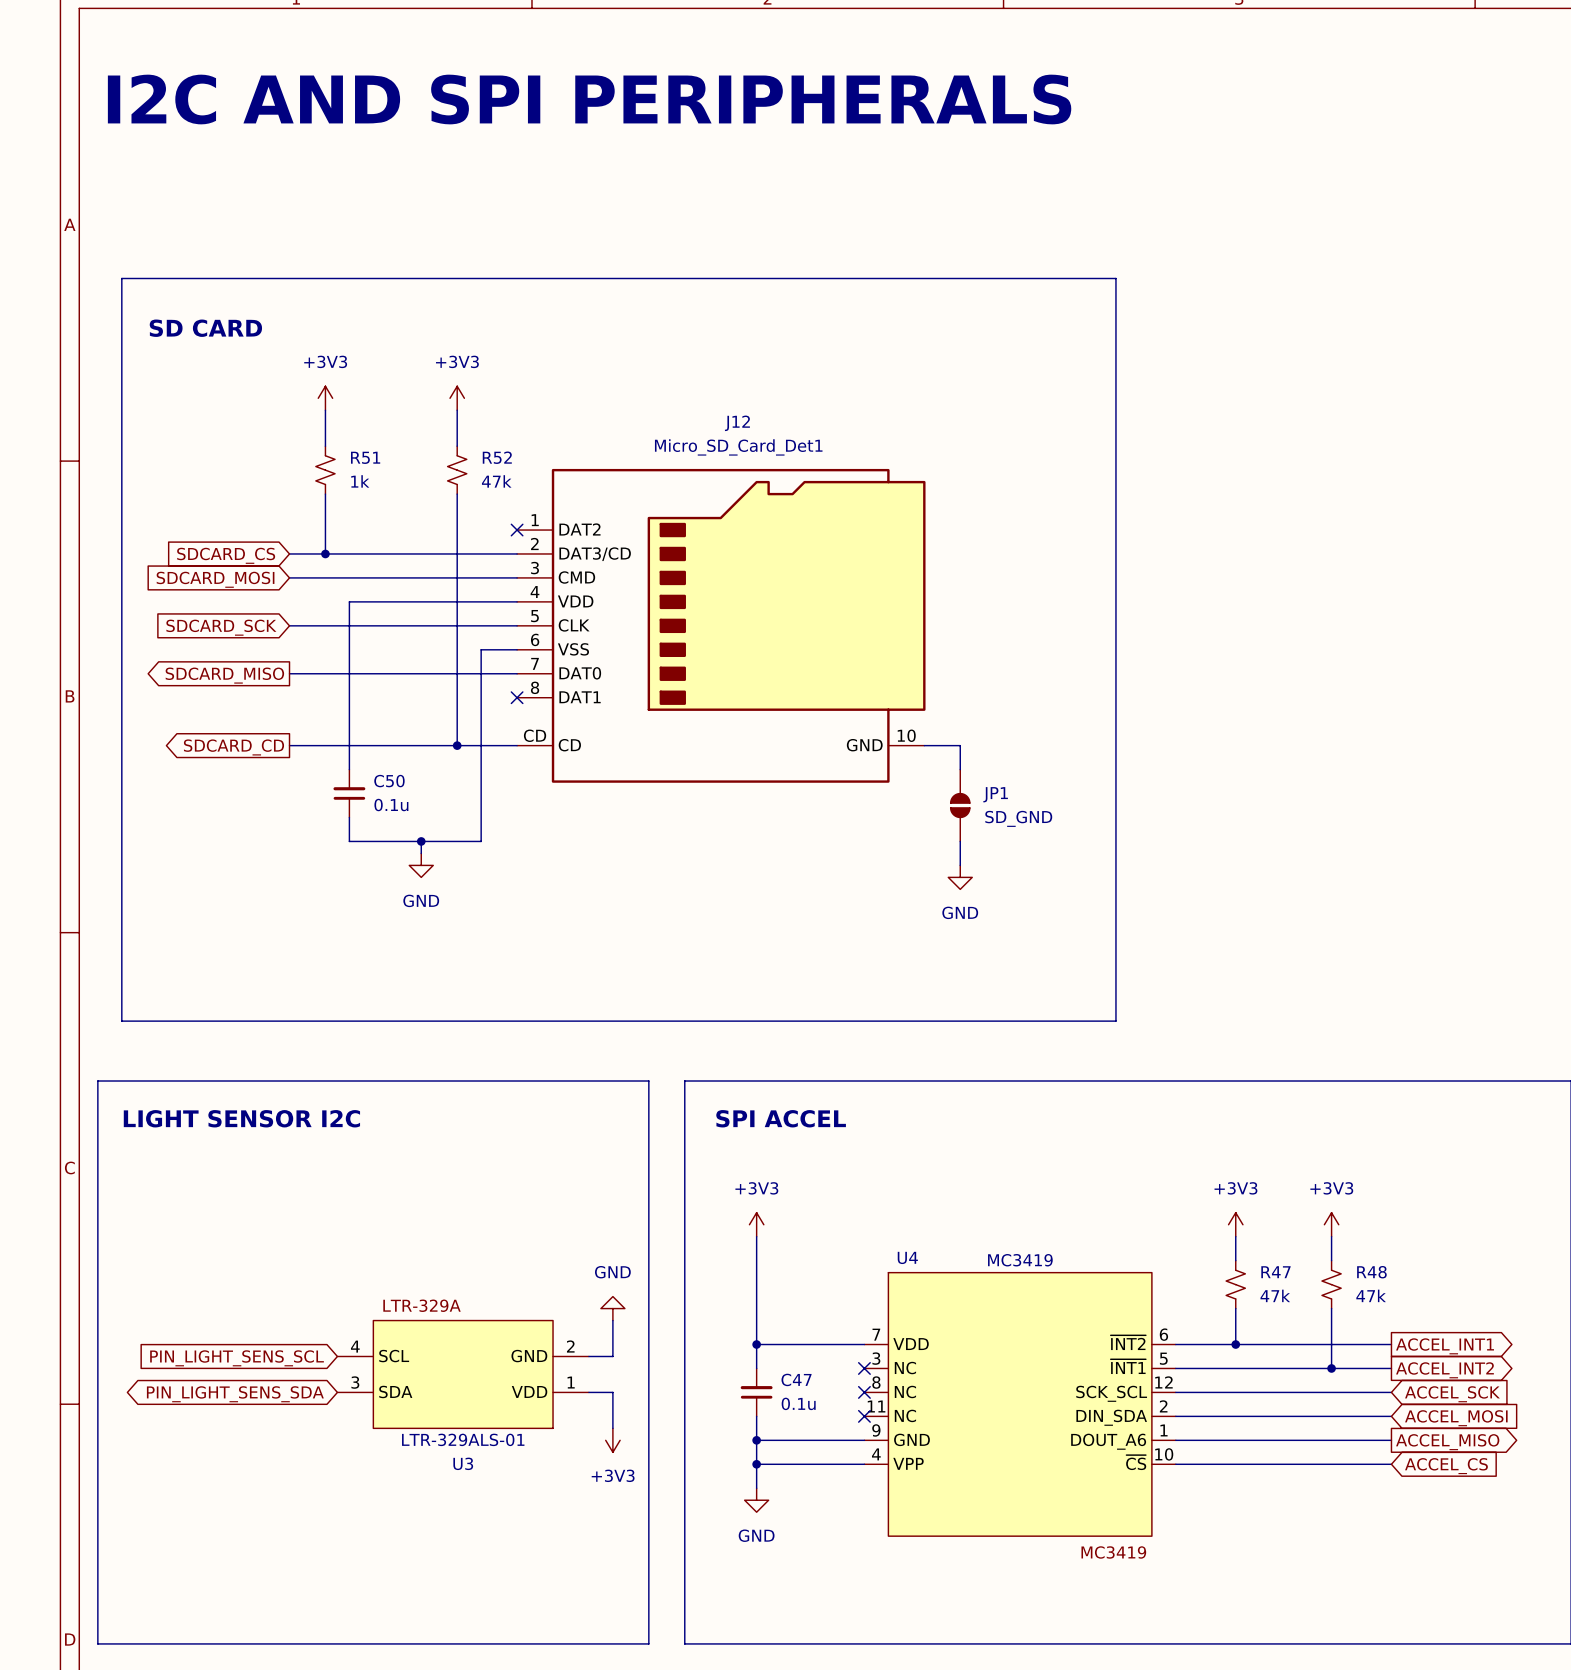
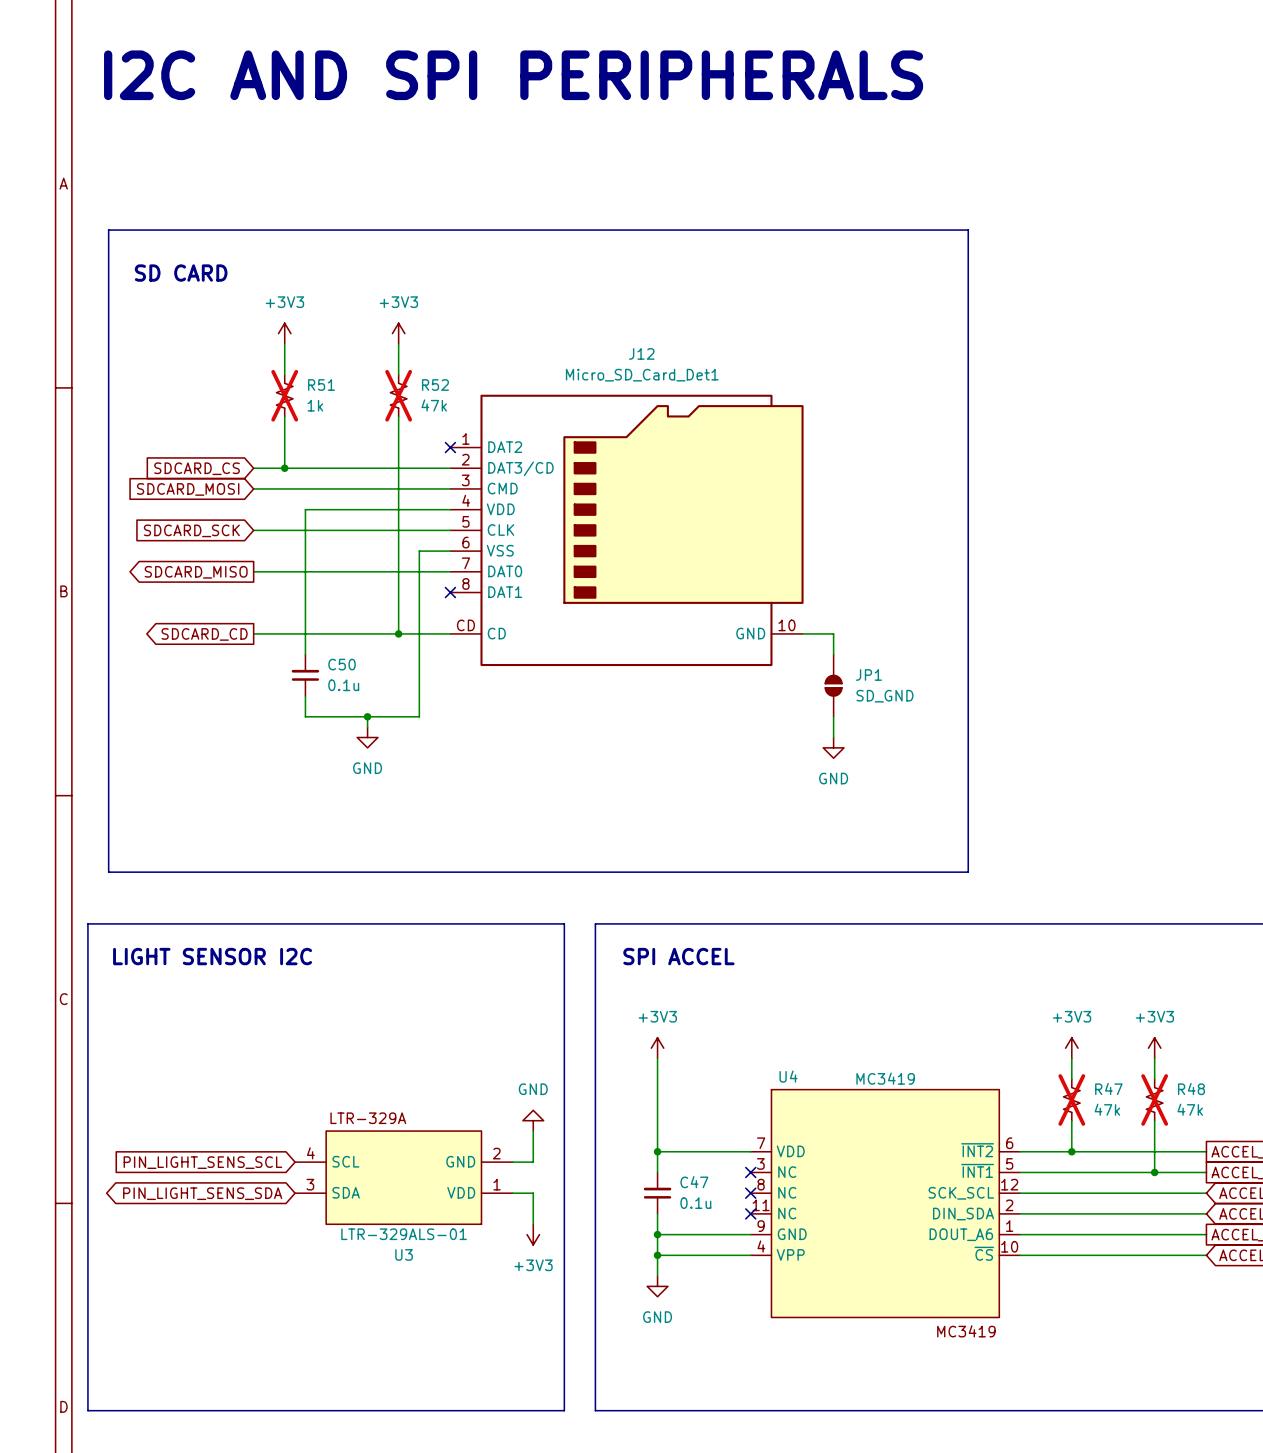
R51 do-not-place cross: none -> (284, 395)
R52 do-not-place cross: none -> (398, 395)
R47 do-not-place cross: none -> (1071, 1099)
R48 do-not-place cross: none -> (1154, 1099)

